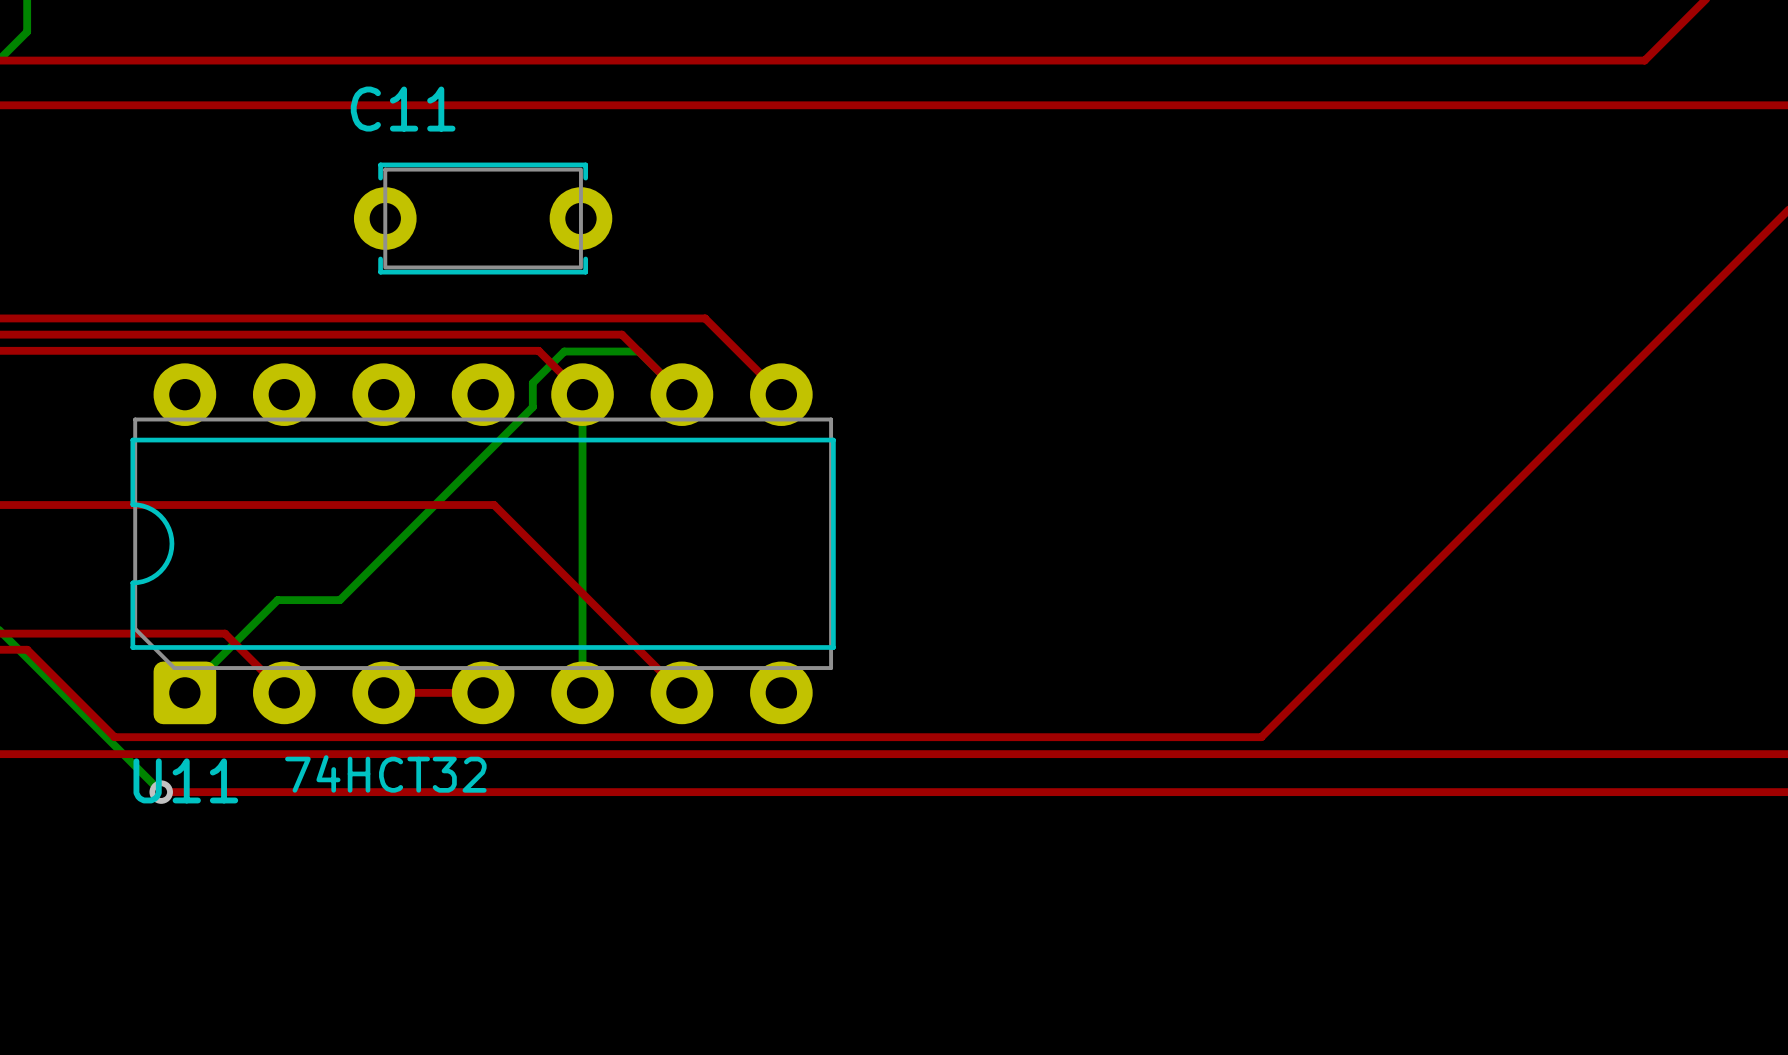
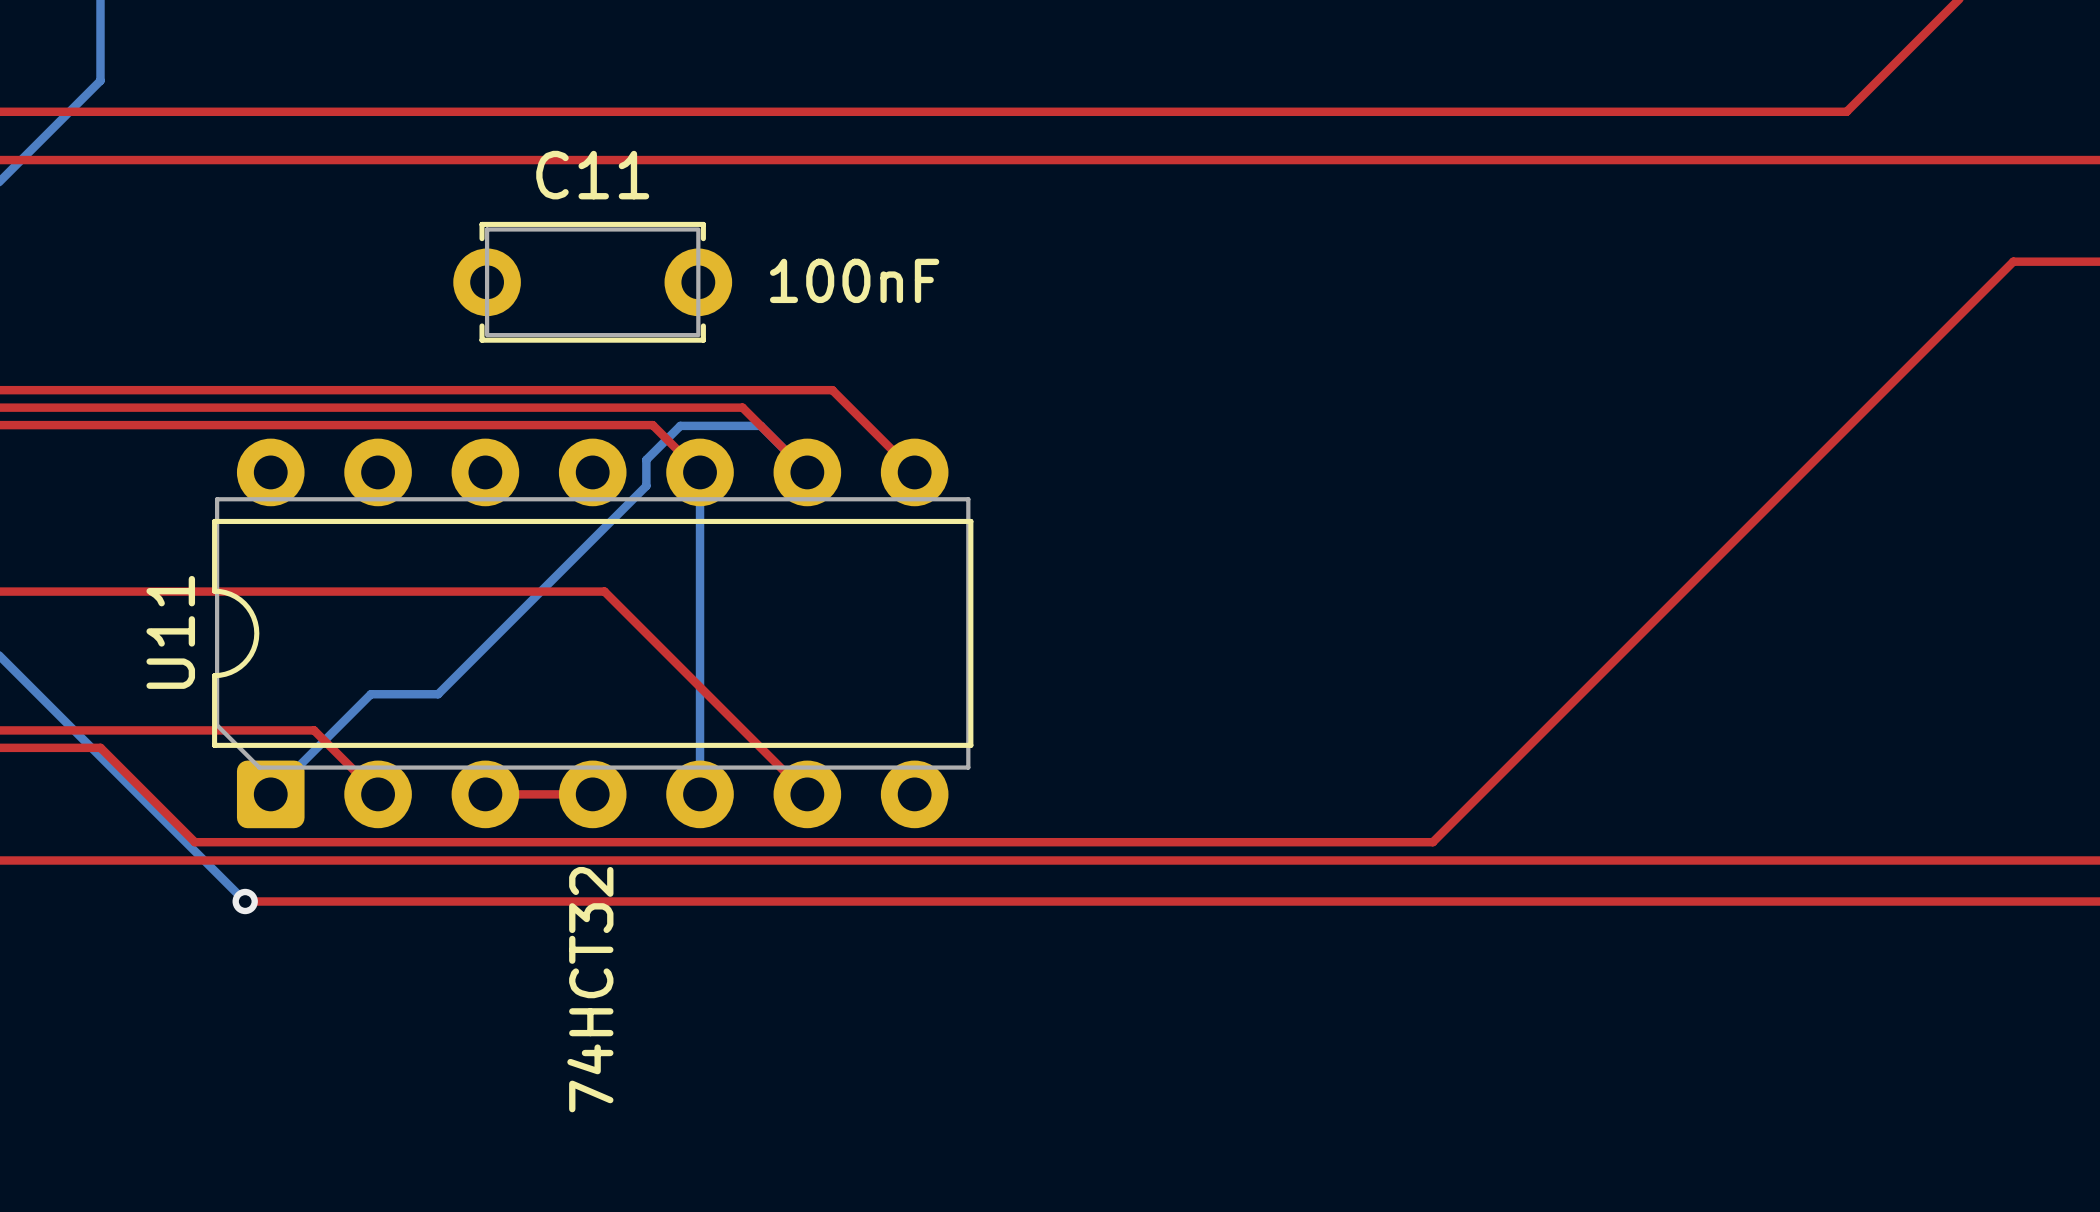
C11 name position: C11 (403, 109) -> C11 (592, 175)
C11 value: none -> 100nF (854, 280)
text: 74HCT32 (385, 773) -> none
U11 name rotation: 0° (185, 780) -> 90° counterclockwise (170, 632)
U11 name position: U11 (185, 780) -> U11 (170, 632)
U11 value: none -> 74HCT32 (590, 989)

